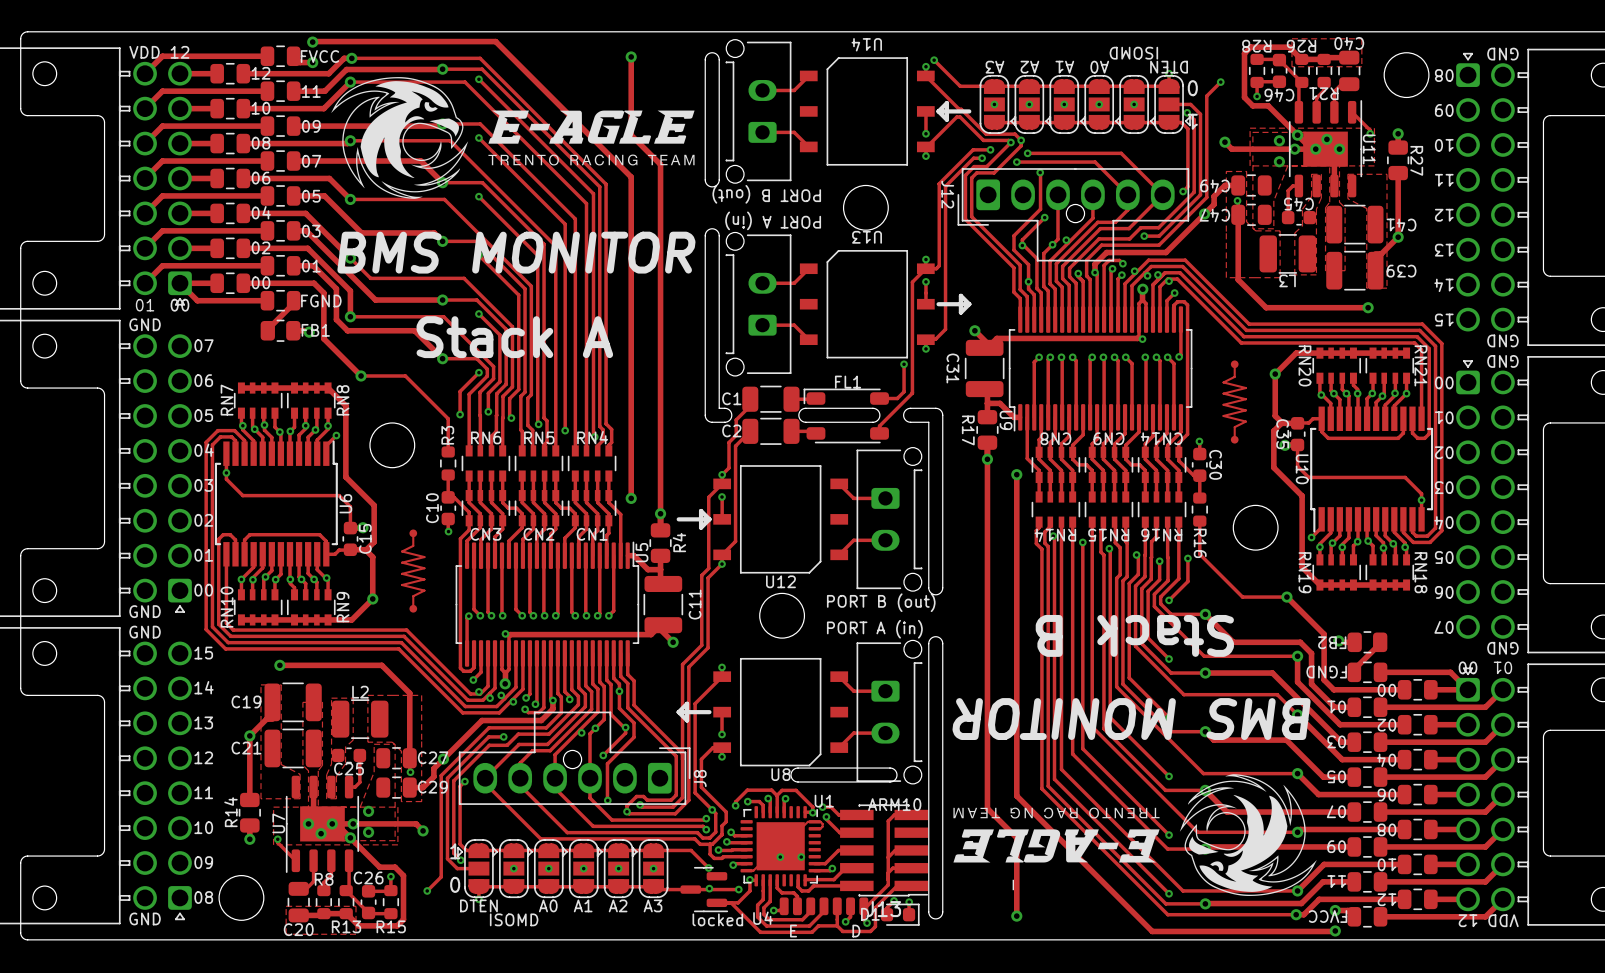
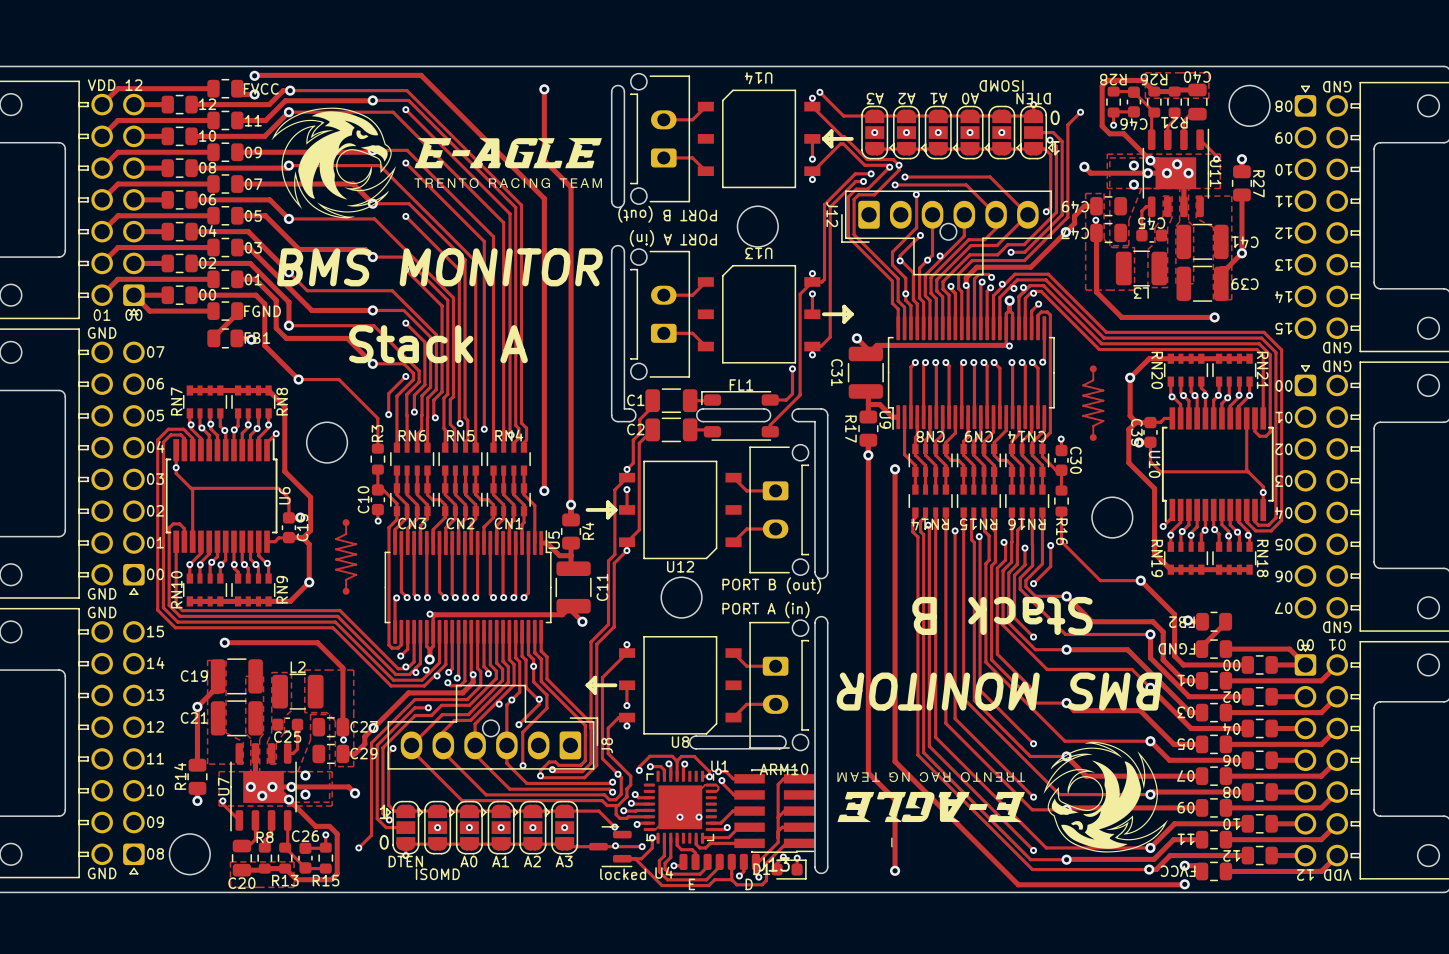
track: (1321, 418) (1321, 431) (1328, 438) (1398, 438) (1403, 433) -> (1248, 471) (1246, 470) (1246, 431)
track: (244, 539) (249, 534) (319, 534) (326, 541) (326, 554) -> (192, 528) (192, 489) (191, 488)

